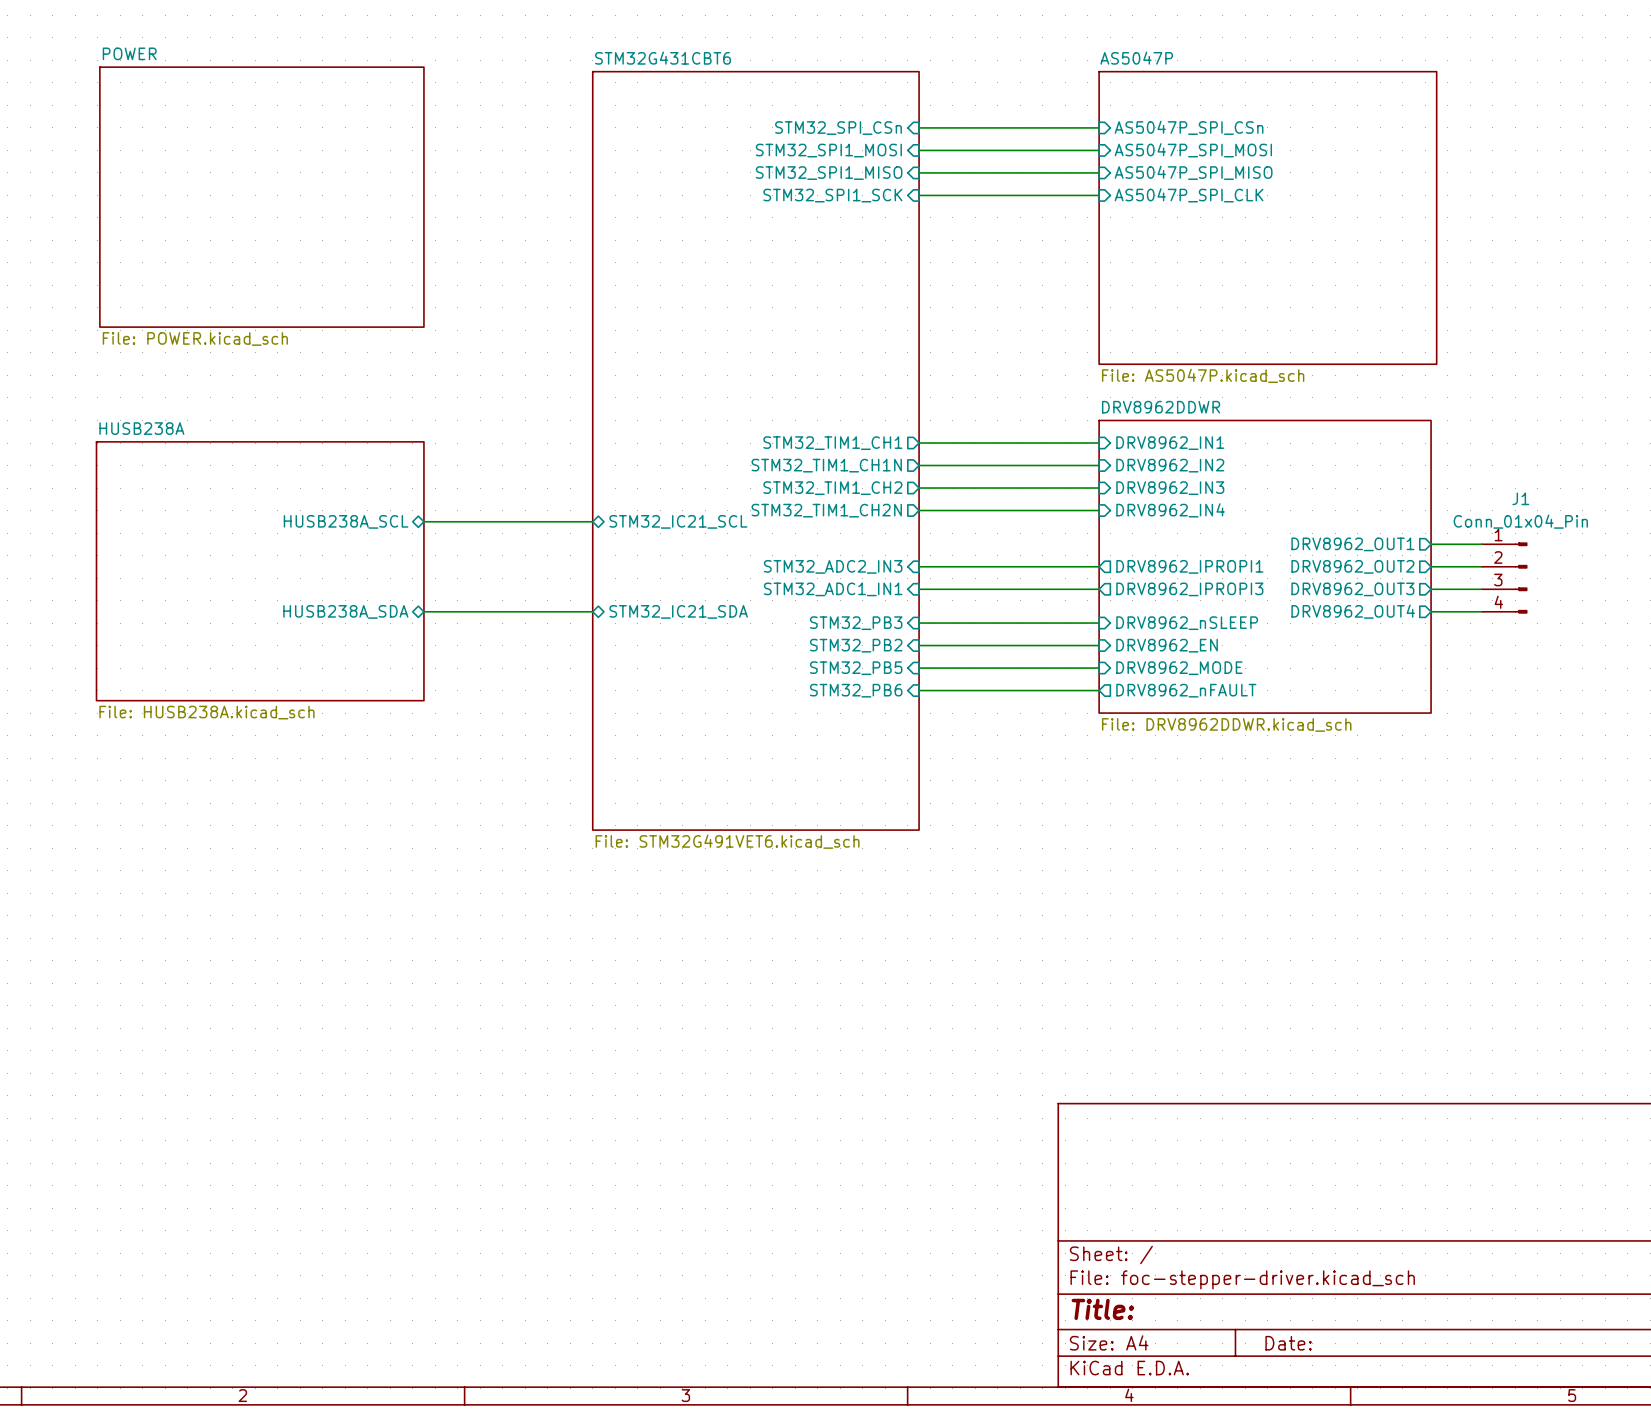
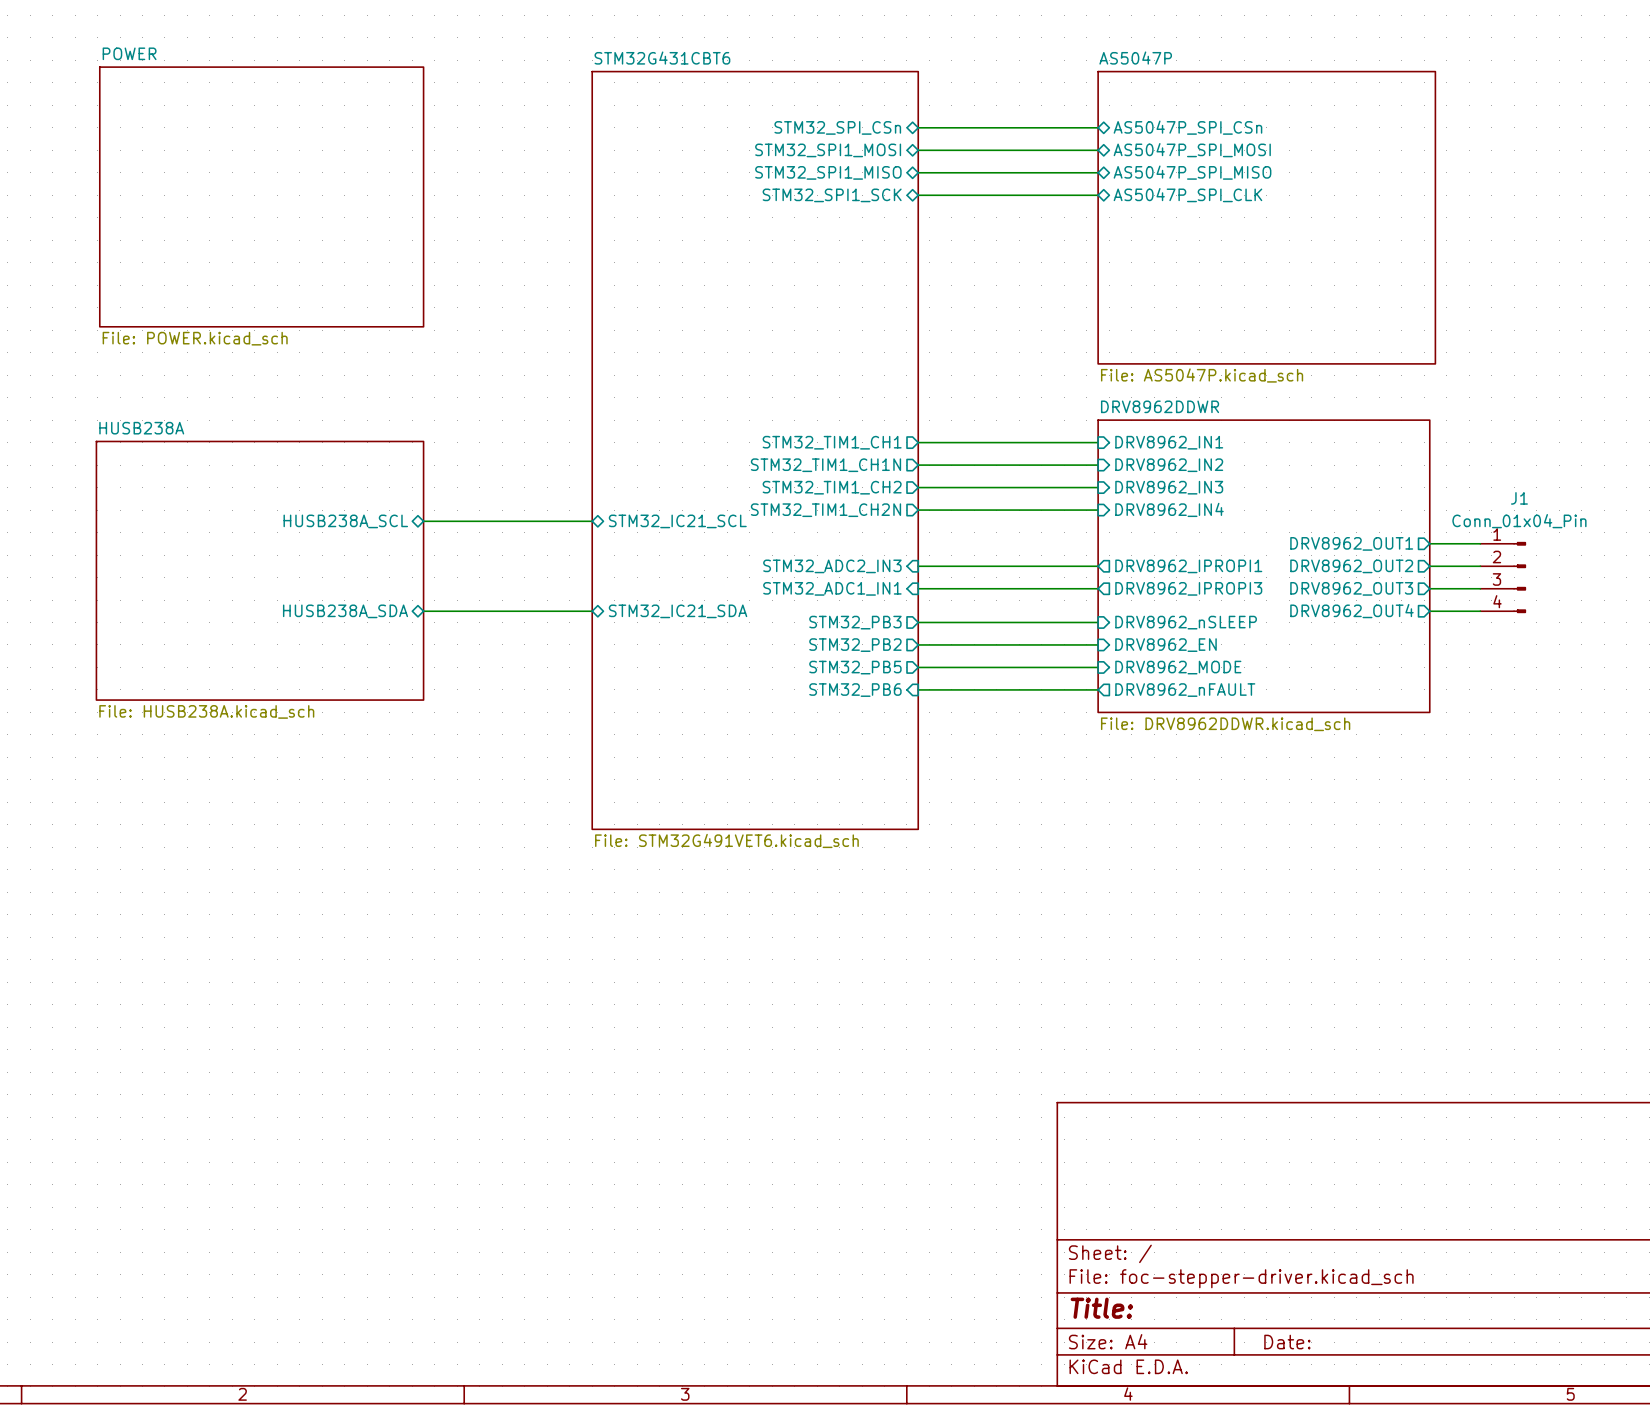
sheet pin shape: input (1189, 127) -> bidirectional (1187, 127)
sheet pin shape: input (838, 128) -> bidirectional (837, 127)
sheet pin shape: input (828, 150) -> bidirectional (828, 150)
sheet pin shape: input (1193, 150) -> bidirectional (1192, 150)
sheet pin shape: input (1193, 172) -> bidirectional (1192, 172)
sheet pin shape: input (829, 173) -> bidirectional (828, 172)
sheet pin shape: input (832, 195) -> bidirectional (832, 195)
sheet pin shape: input (1189, 195) -> bidirectional (1187, 195)
sheet pin shape: input (856, 623) -> output (855, 622)
sheet pin shape: input (856, 645) -> output (855, 645)
sheet pin shape: input (856, 668) -> output (855, 667)

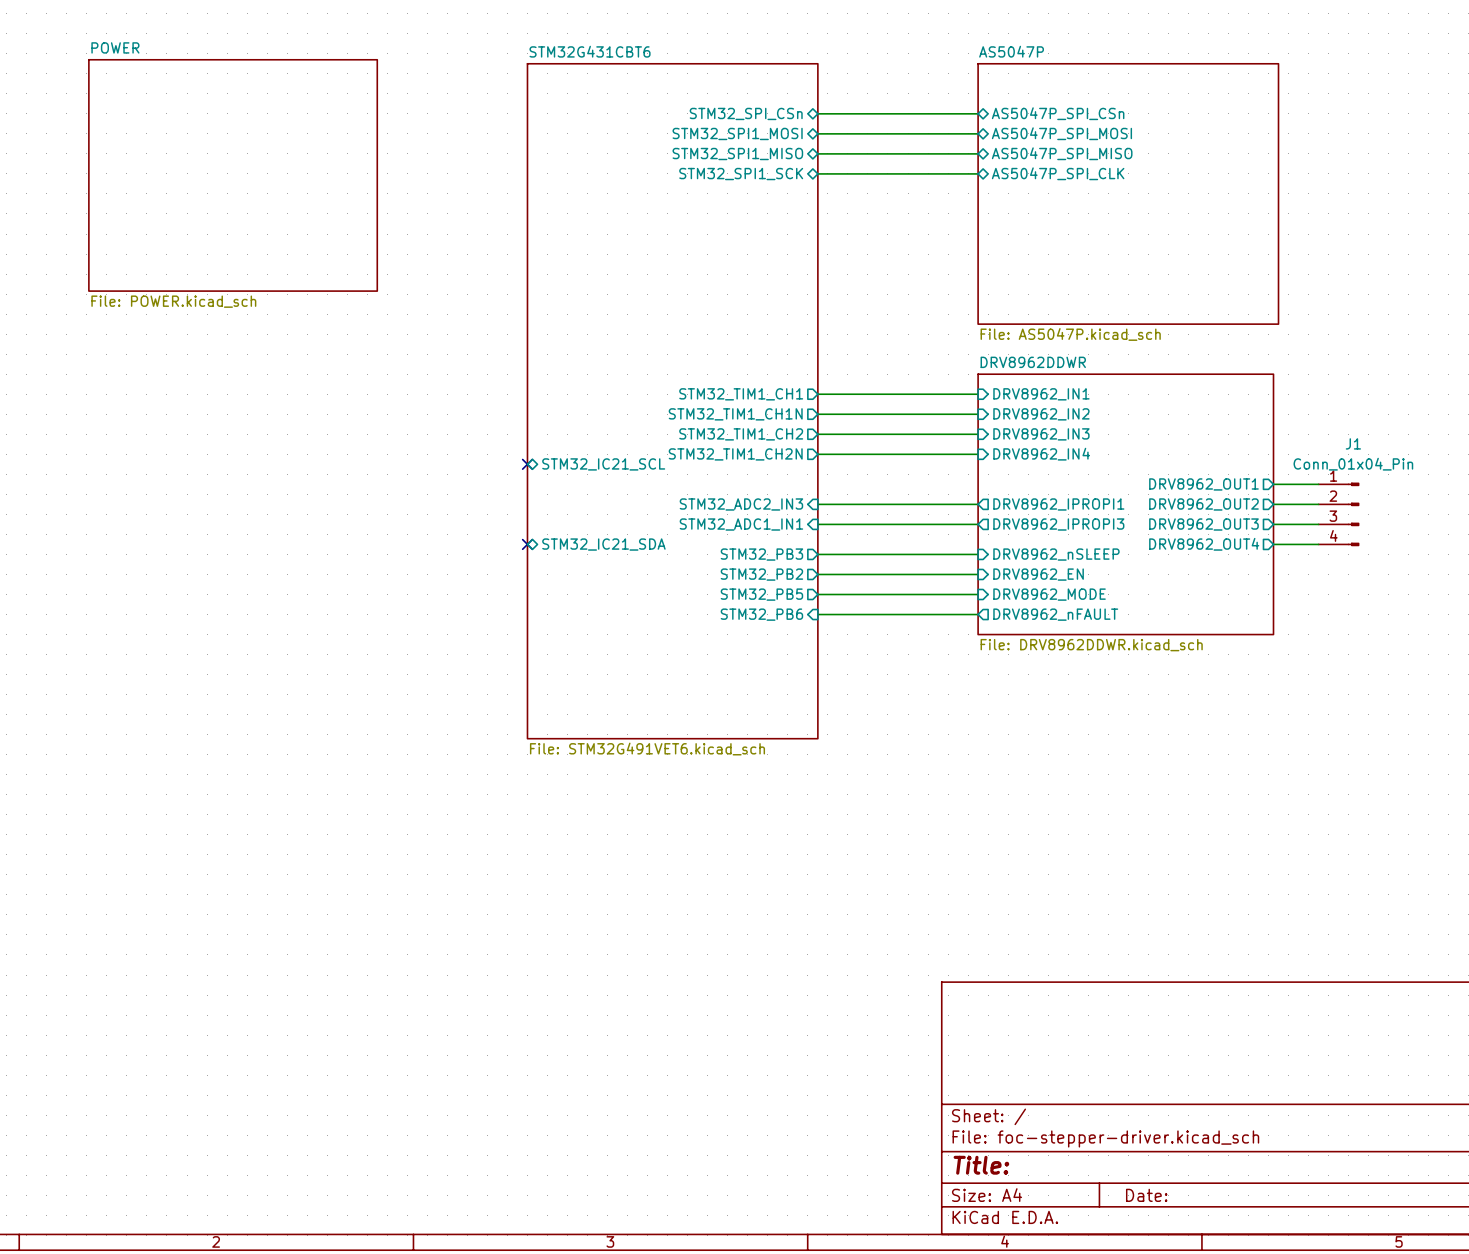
sheet pin: HUSB238A_SCL (345, 521) -> none
wire: (423, 521) (592, 521) -> none
no-connect mark: none -> (527, 464)
sheet HUSB238A: File: HUSB238A.kicad_sch (259, 570) -> none
sheet pin: HUSB238A_SDA (345, 611) -> none
wire: (423, 611) (592, 611) -> none
no-connect mark: none -> (527, 544)

